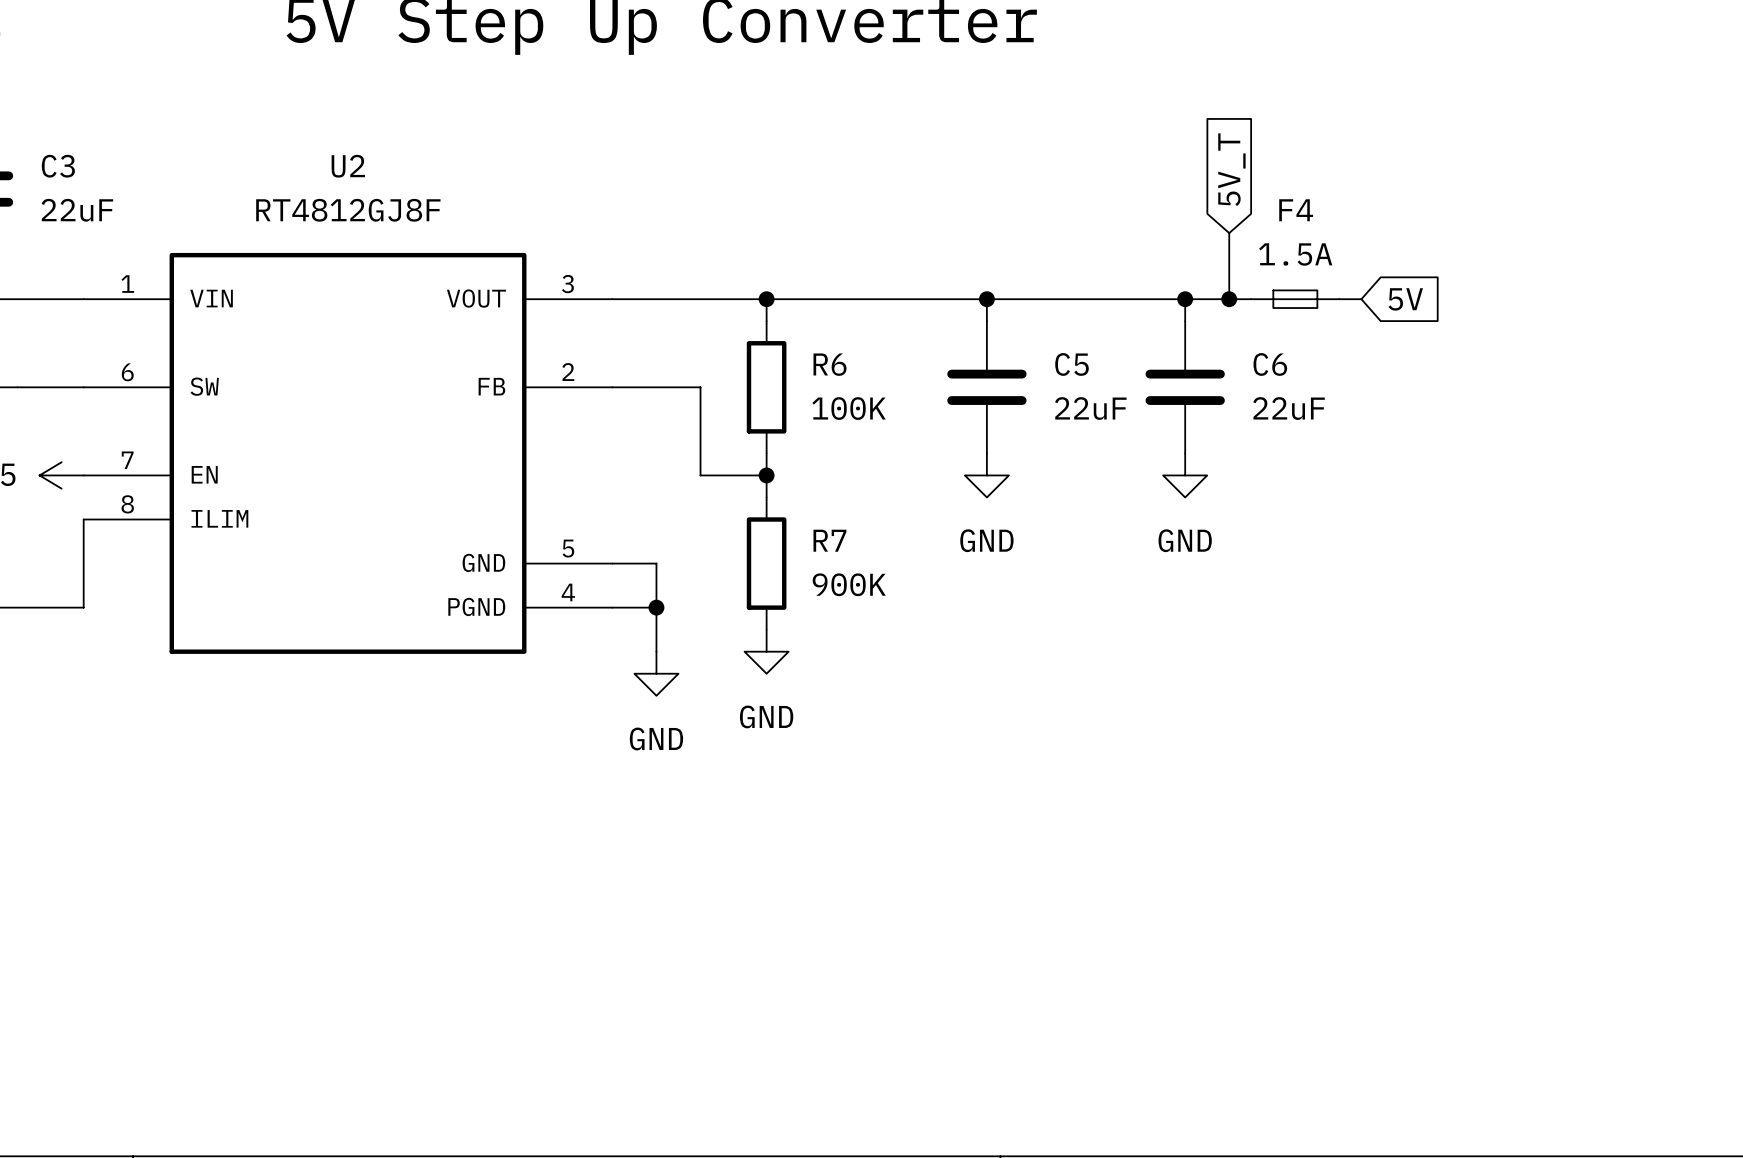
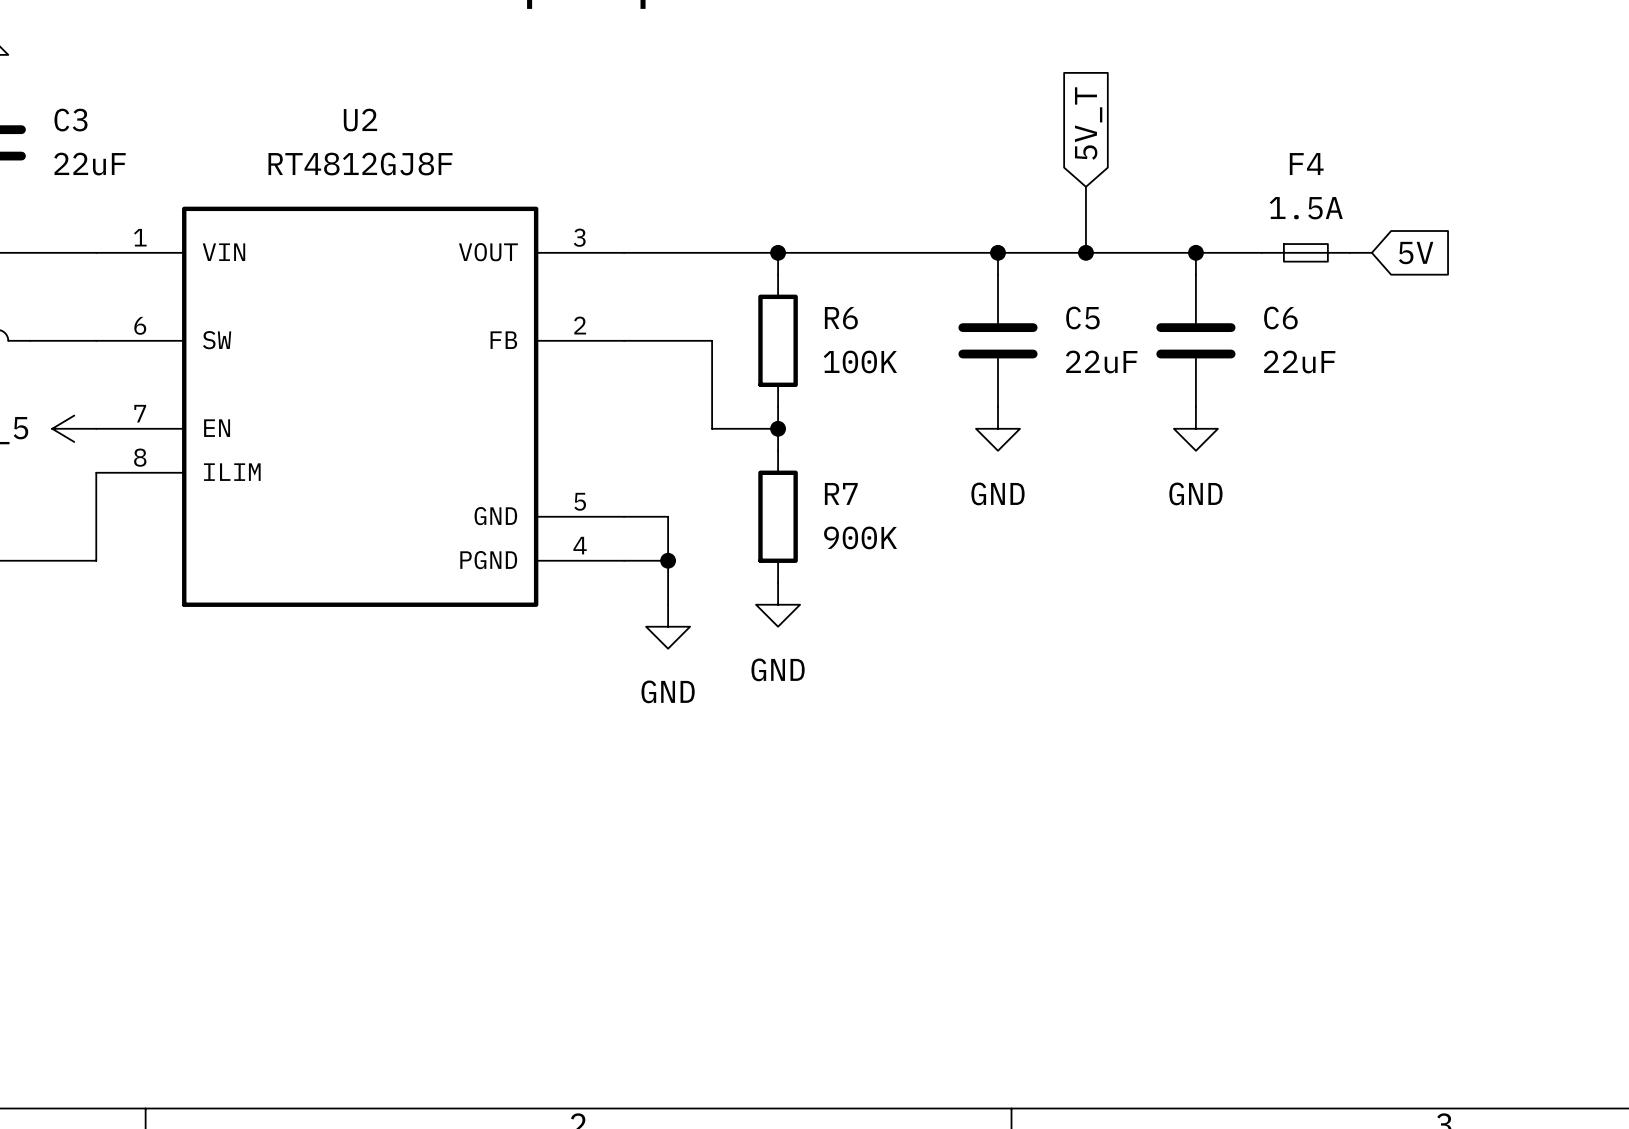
global label position: 5V_T (1231, 169) -> 5V_T (1088, 123)
wire: (1229, 233) (1229, 299) -> (1085, 186) (1085, 252)
junction: none -> (1085, 252)
junction: (1229, 299) -> none

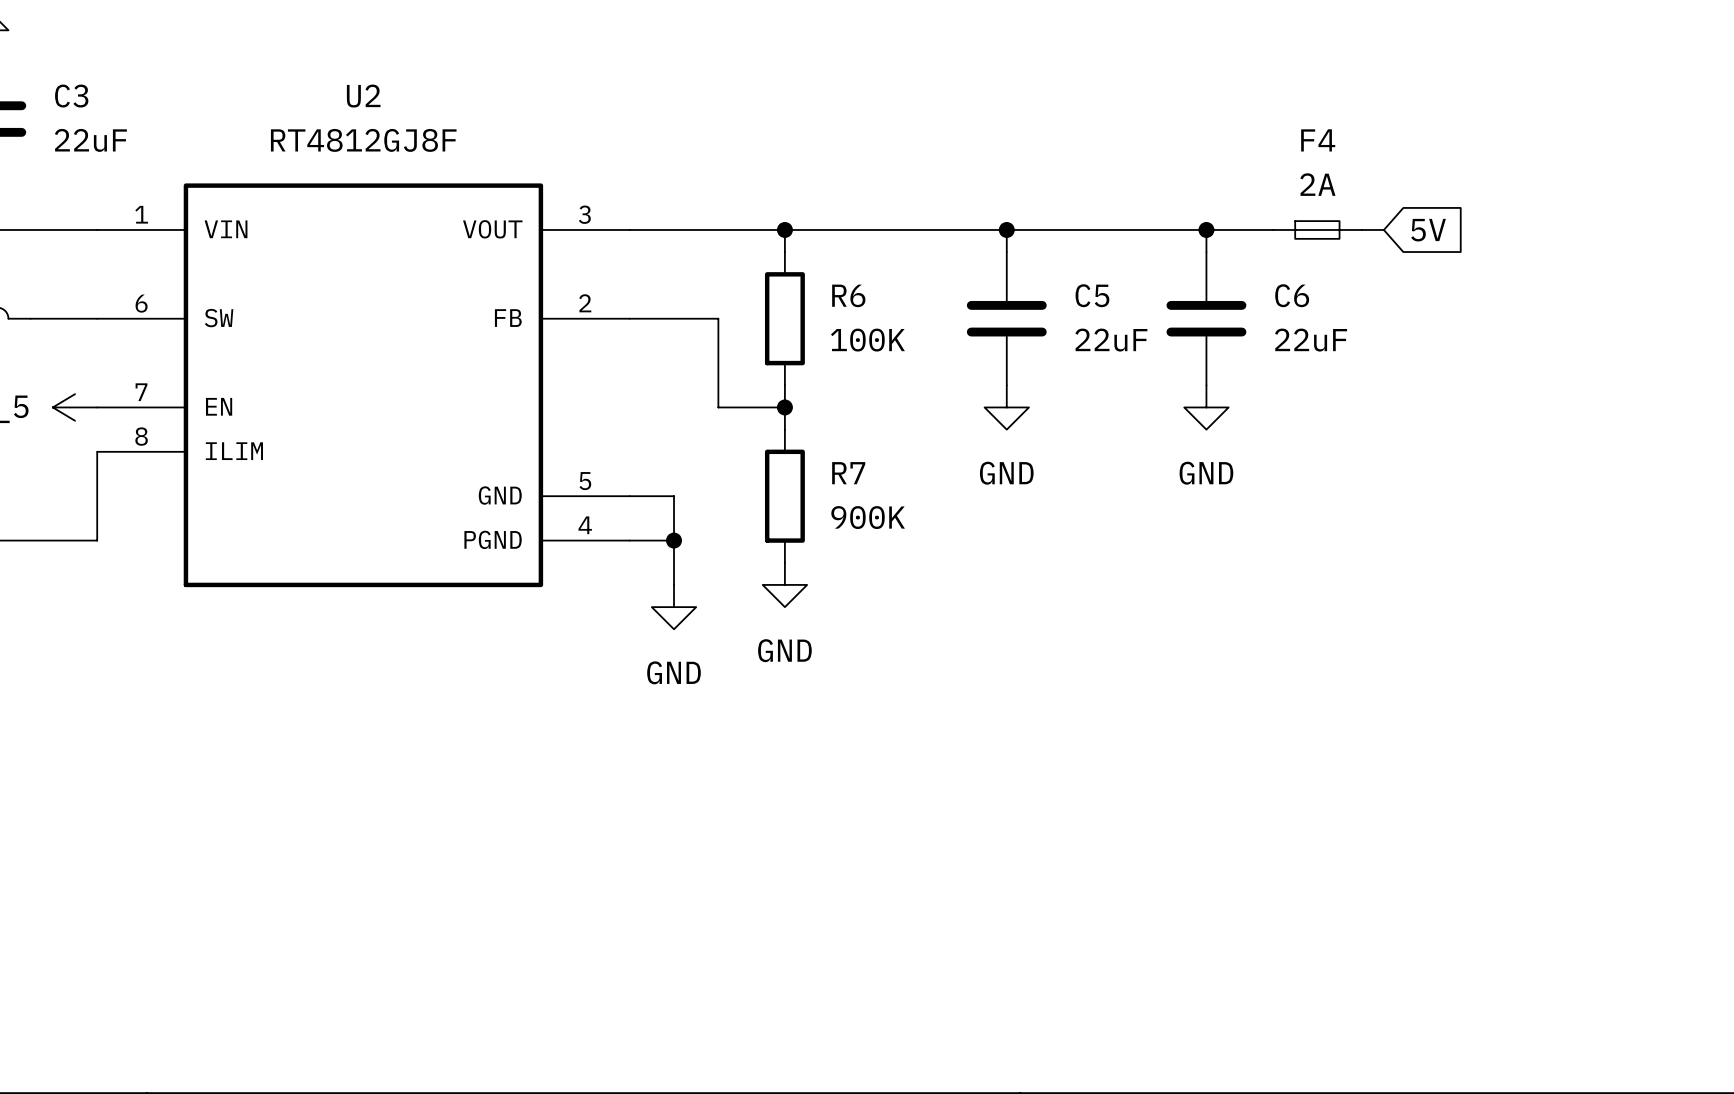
global label: 5V_T (1088, 123) -> none
wire: (1085, 186) (1085, 252) -> none
F4 value: 1.5A (1306, 208) -> 2A (1317, 184)
junction: (1085, 252) -> none

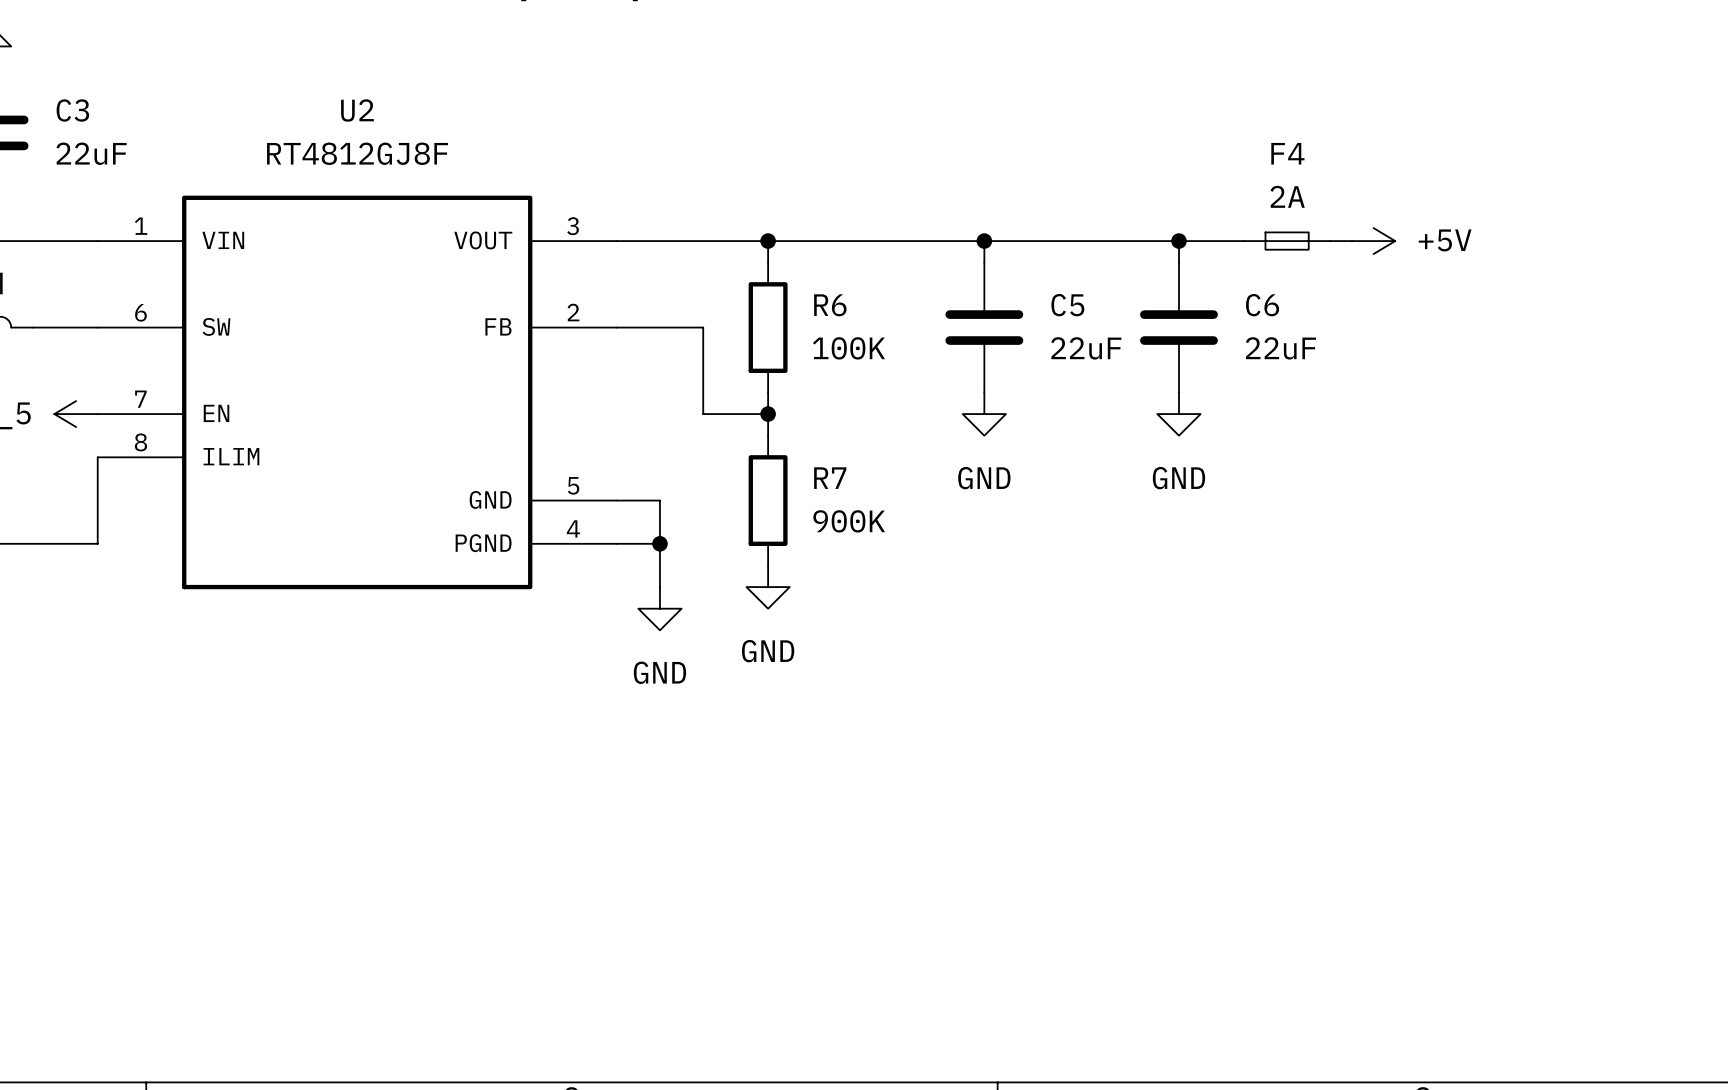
power symbol: none -> +5V (1373, 241)
global label: 5V (1428, 230) -> none

